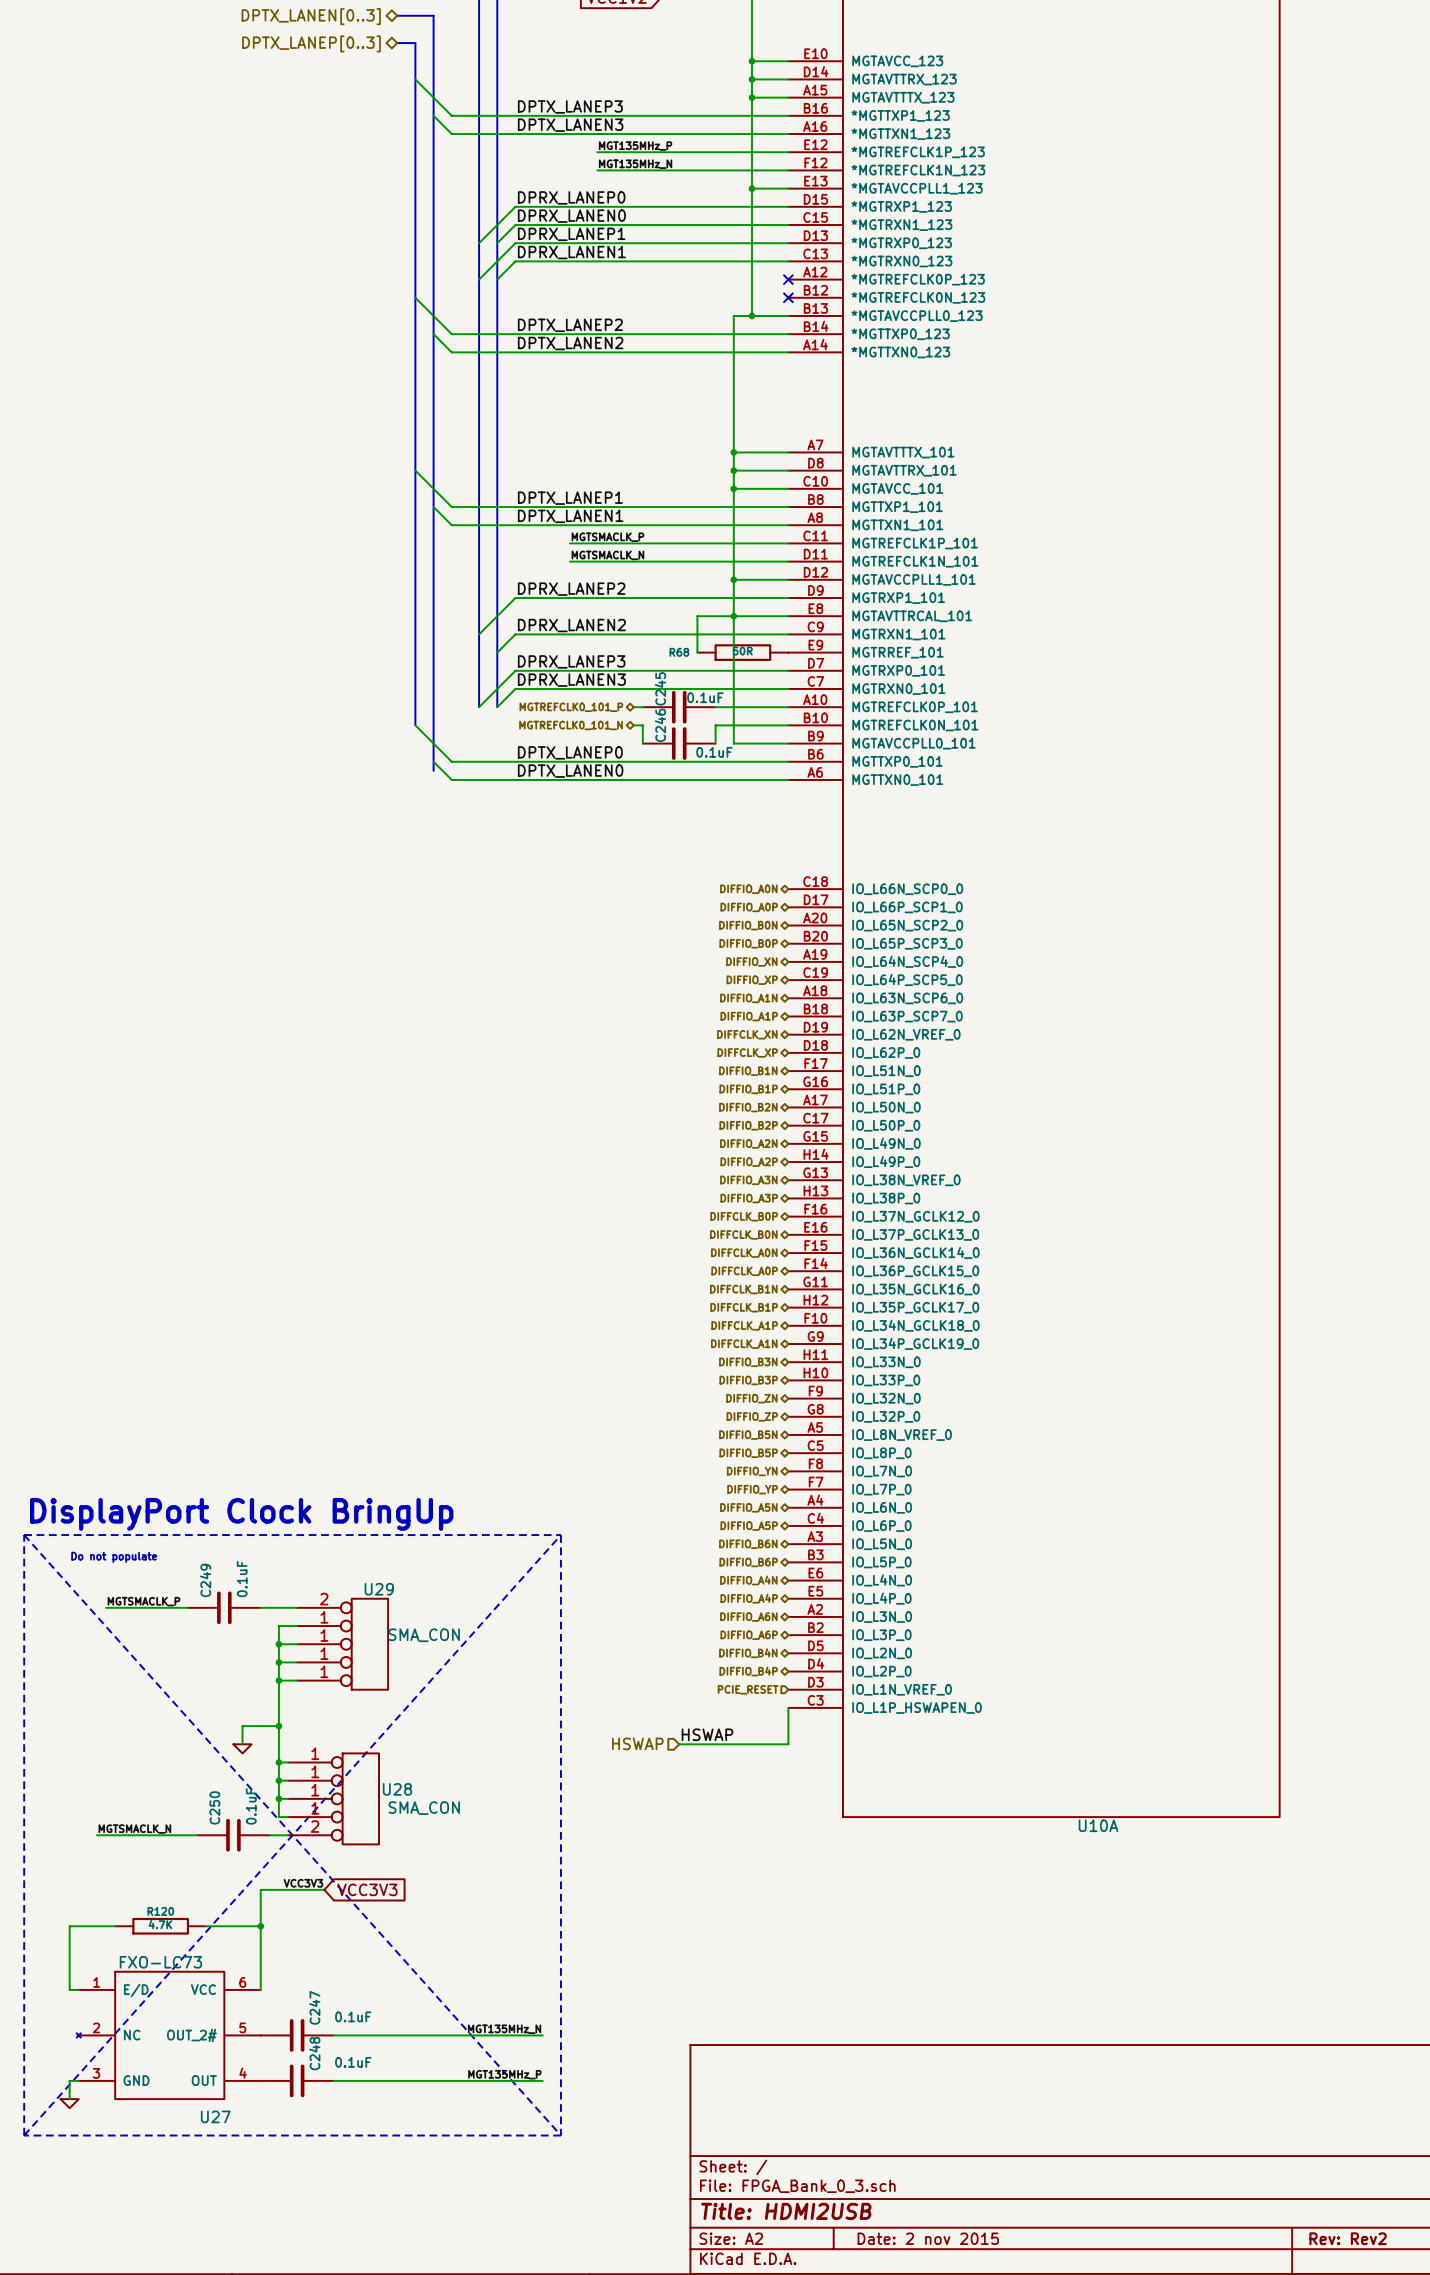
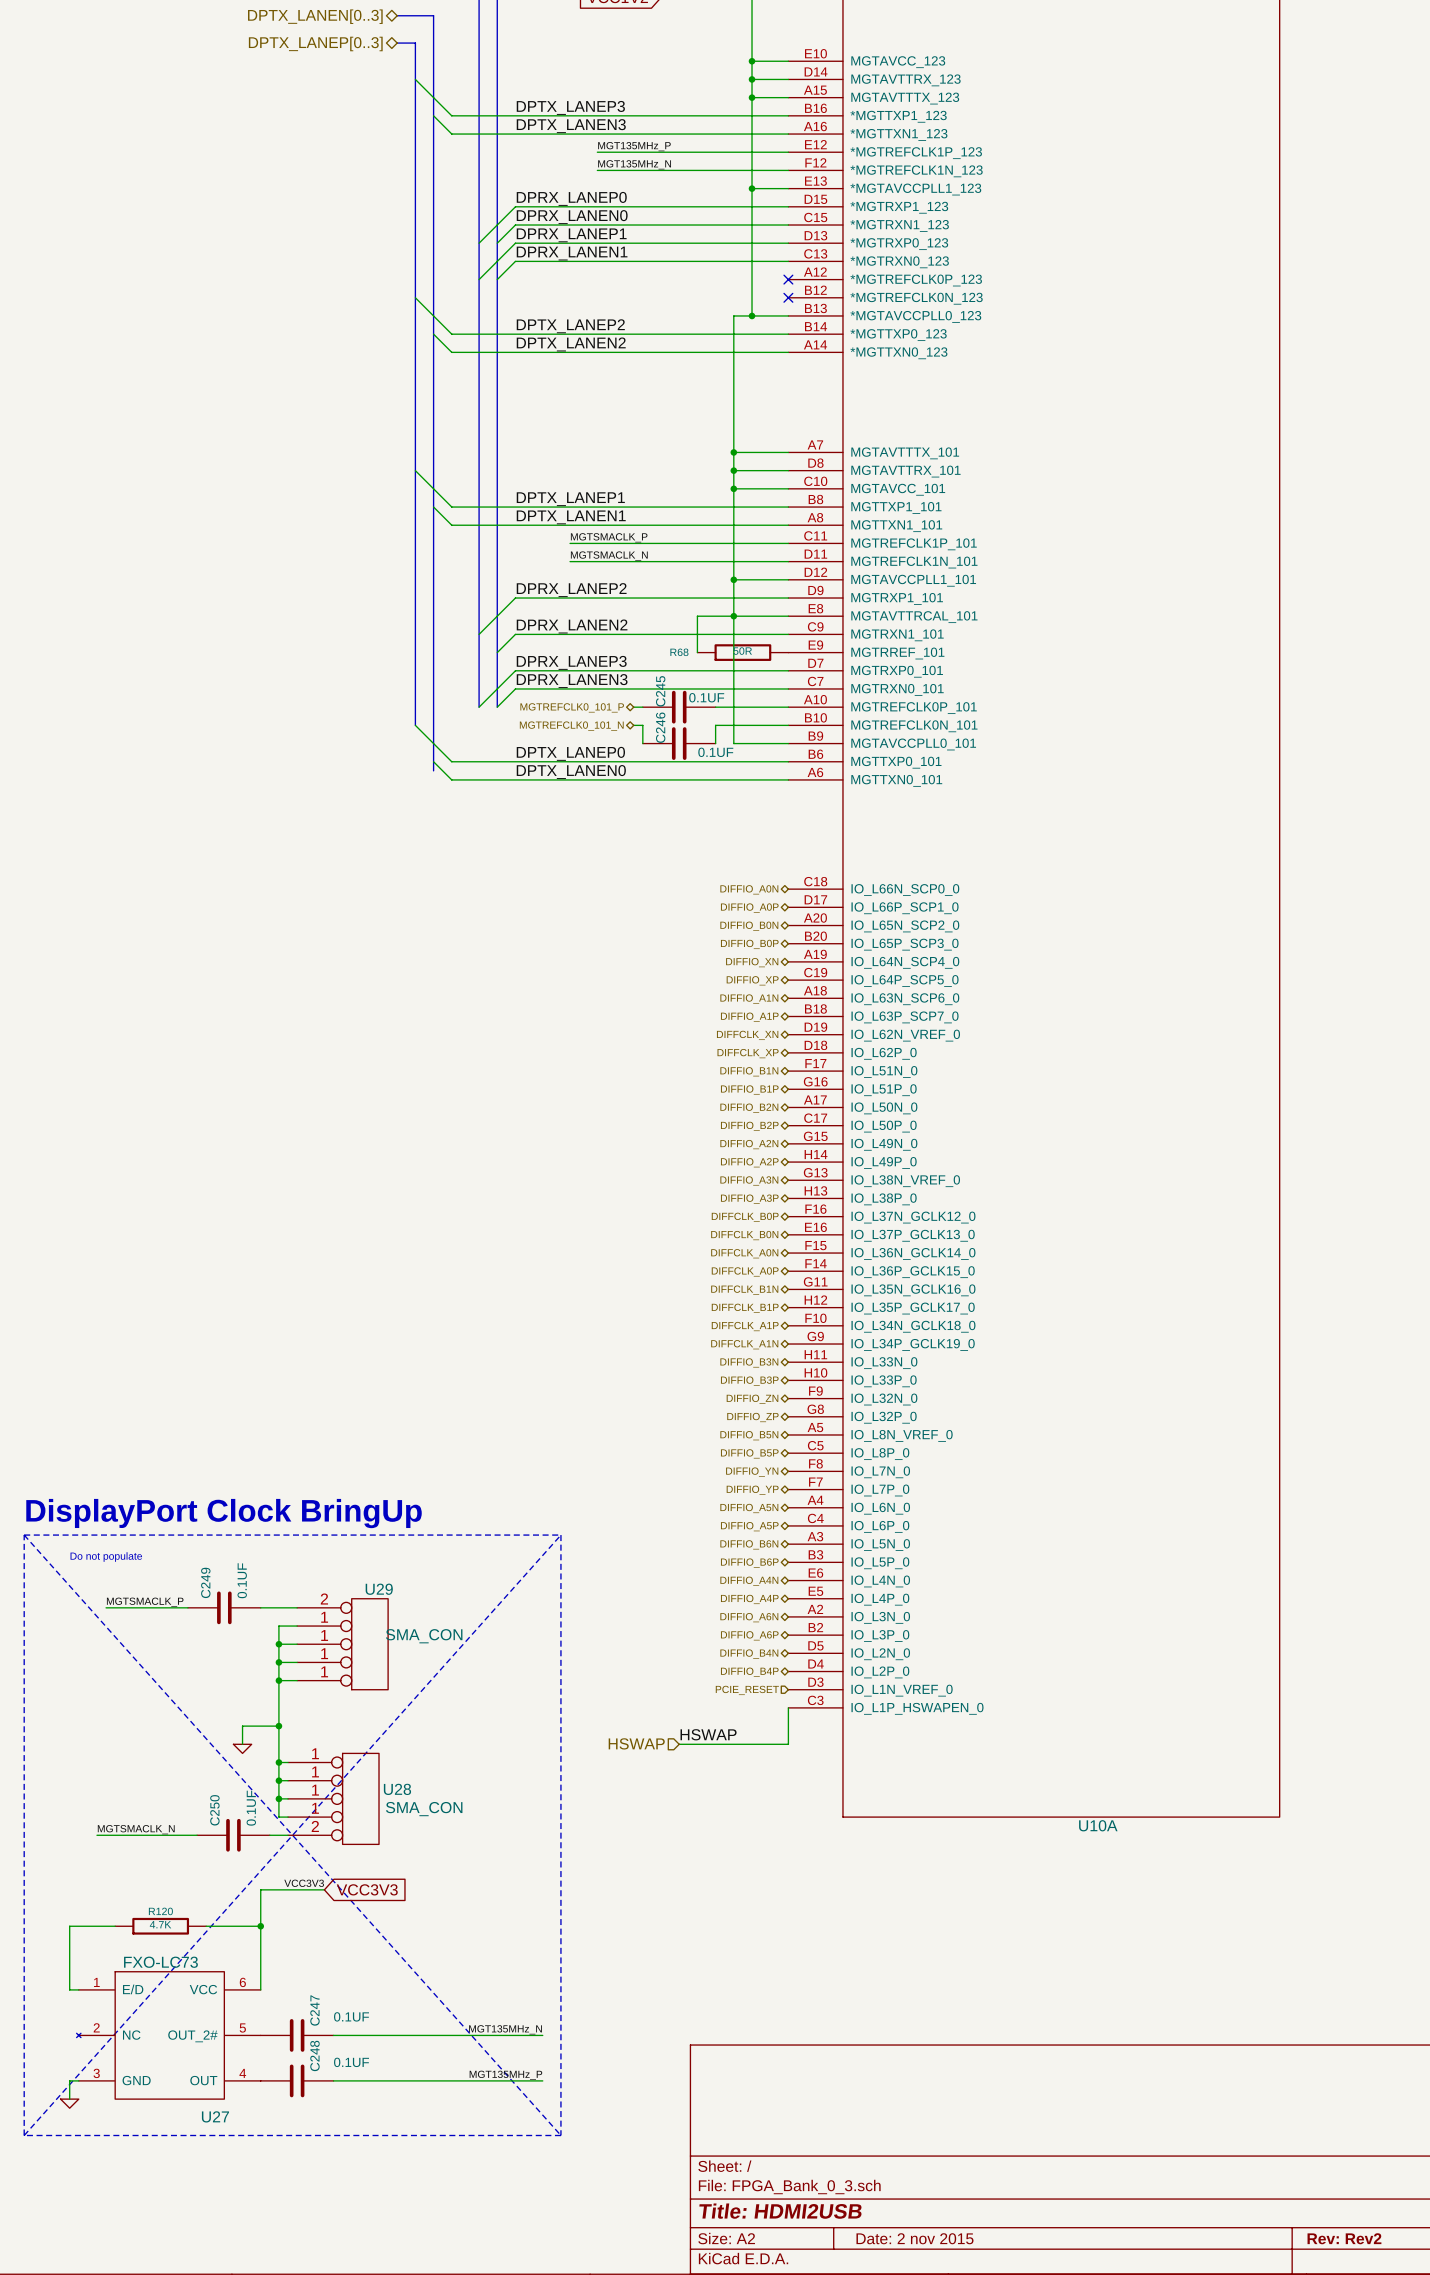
C245 value: 0.1uF (705, 697) -> 0.1UF (706, 697)
C246 value: 0.1uF (714, 752) -> 0.1UF (715, 752)
C249 value: 0.1uF (242, 1578) -> 0.1UF (242, 1580)
C250 value: 0.1uF (251, 1806) -> 0.1UF (251, 1808)
C247 value: 0.1uF (353, 2016) -> 0.1UF (351, 2016)
C248 value: 0.1uF (353, 2062) -> 0.1UF (351, 2062)

